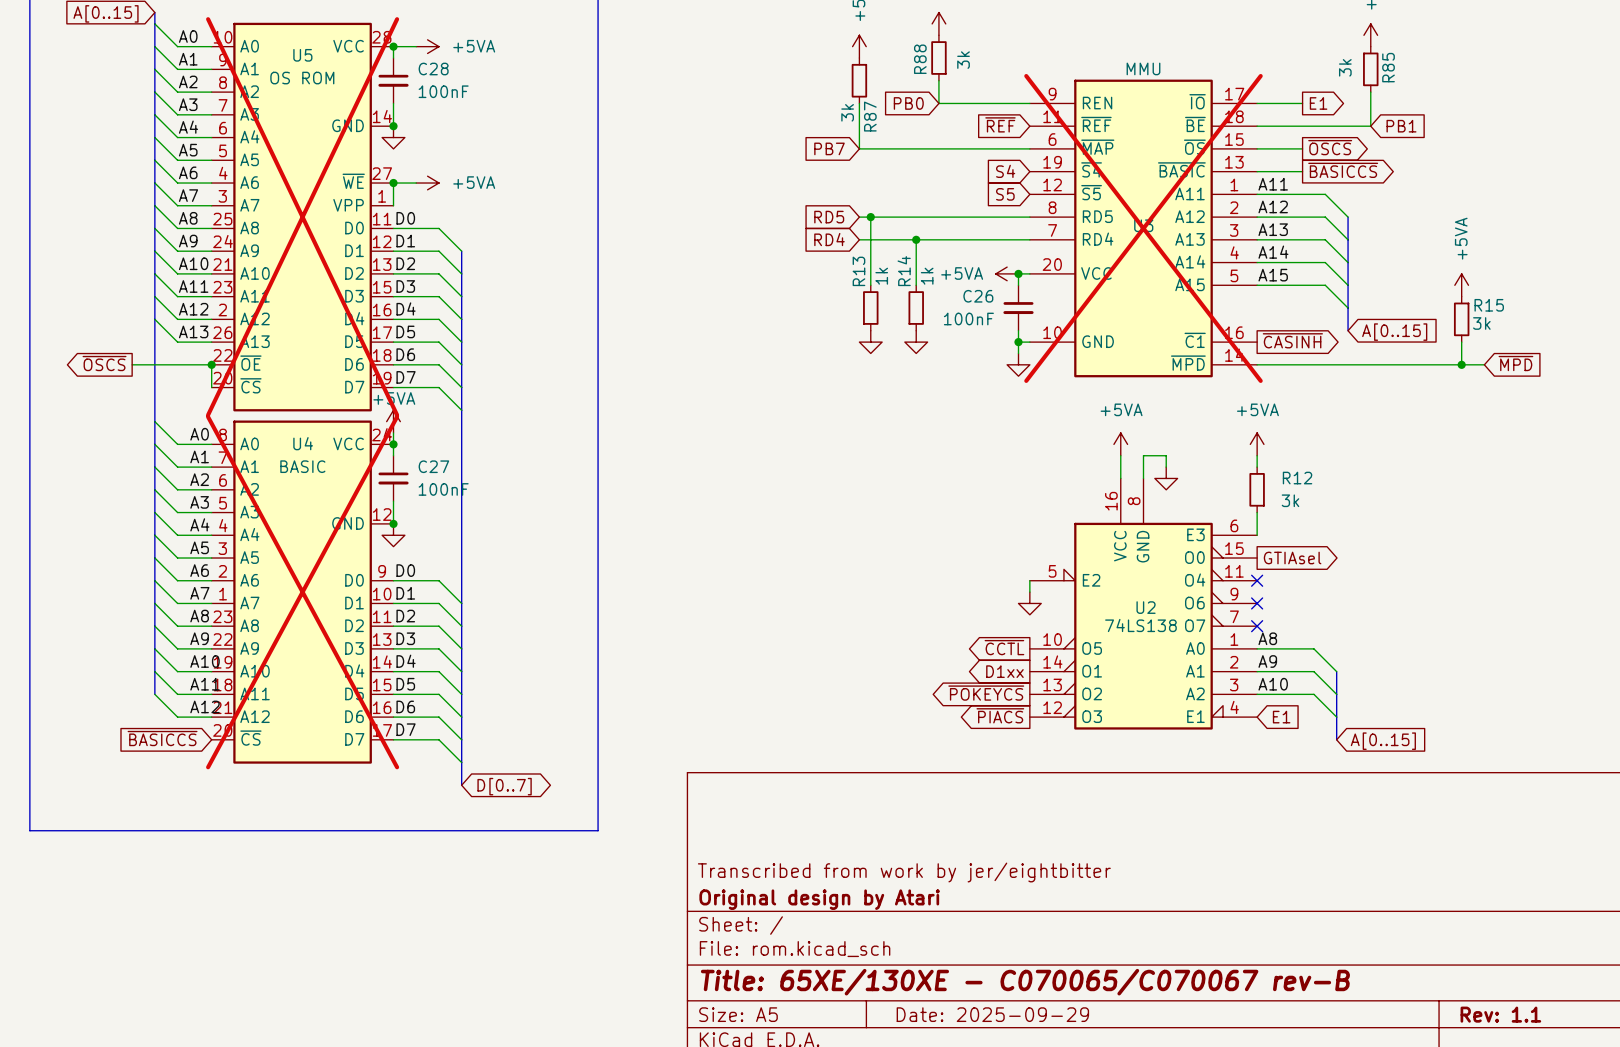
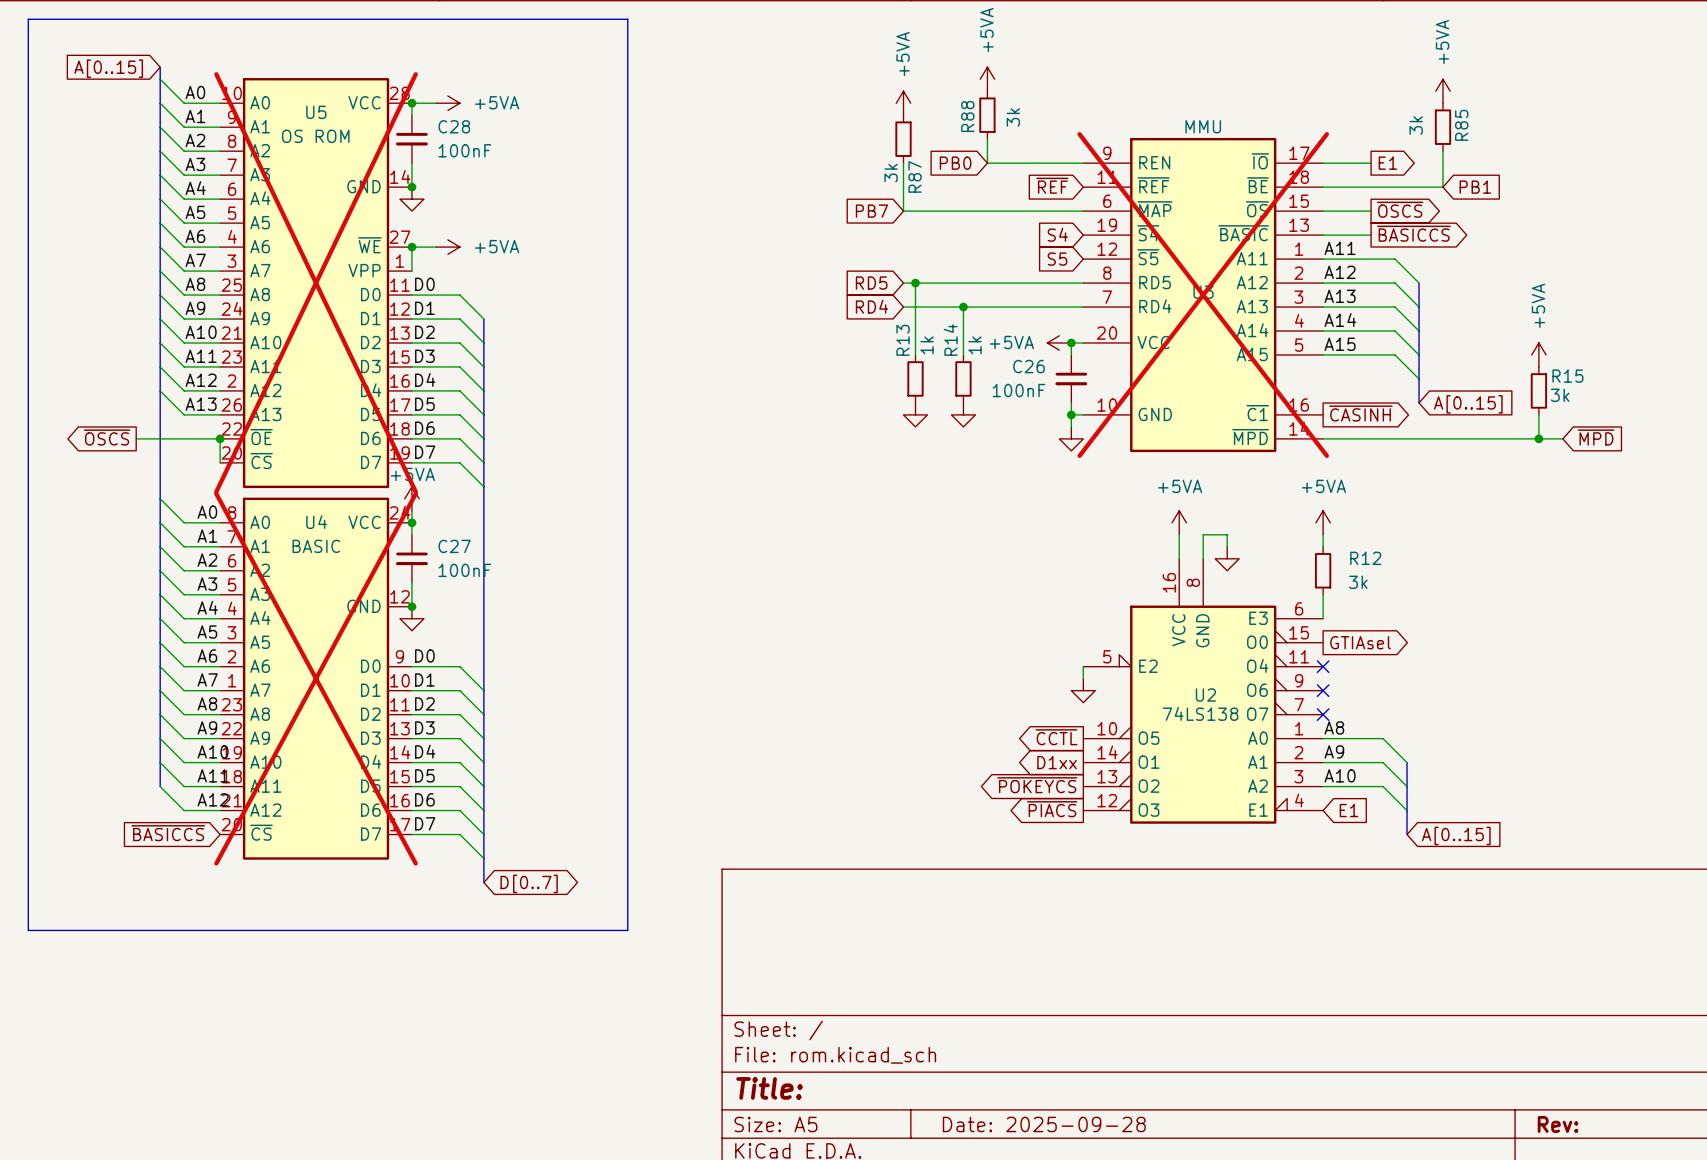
title block: Transcribed from work by jer/eightbitter (904, 872) -> none
title block: Original design by Atari (819, 899) -> none
title block: Title: 65XE/130XE - C070065/C070067 rev-B (1025, 982) -> Title: (769, 1088)
title block: Date: 2025-09-29 (992, 1014) -> Date: 2025-09-28 (1044, 1124)
title block: Rev: 1.1 (1500, 1014) -> Rev: (1558, 1124)

